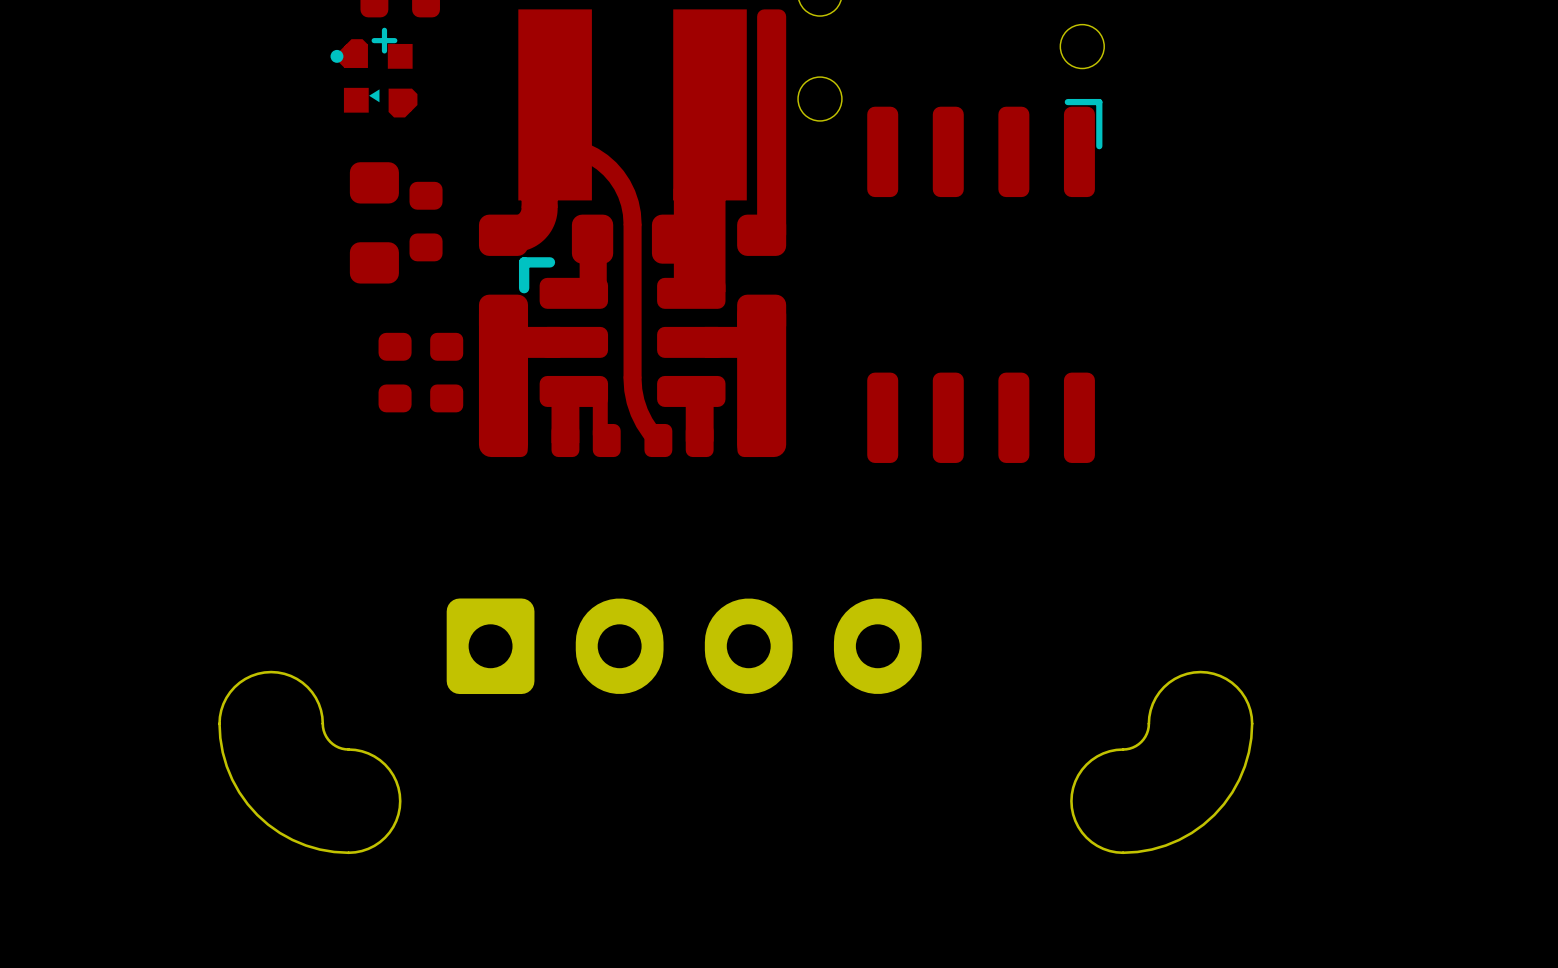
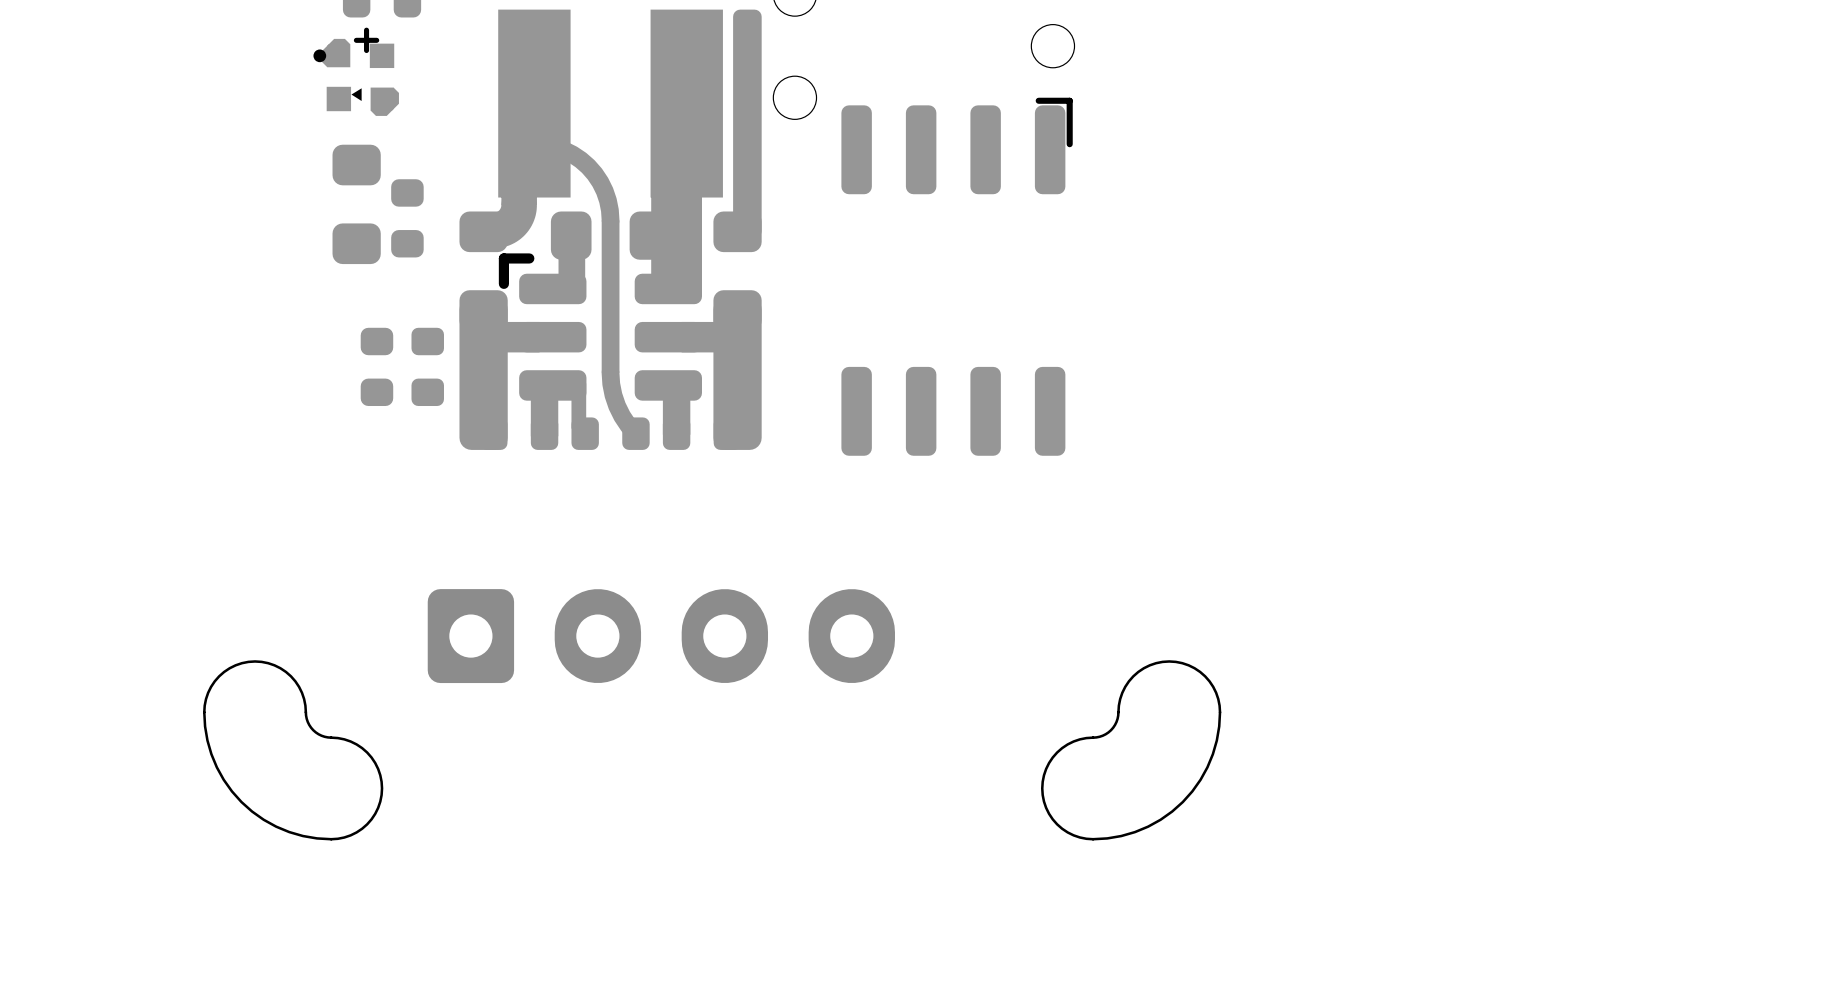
part position: (374, 222) -> (356, 204)

